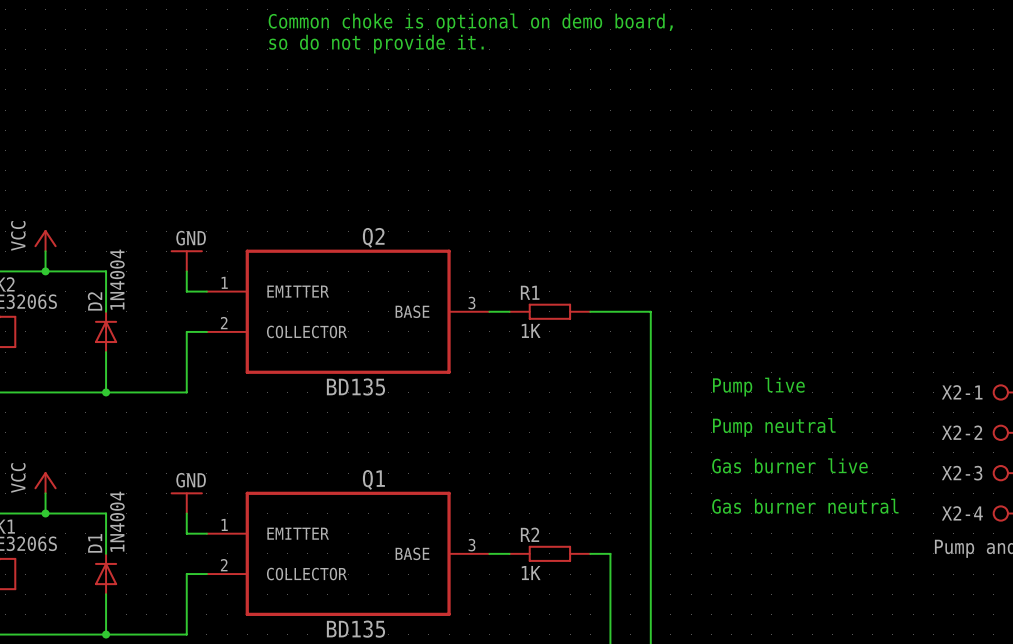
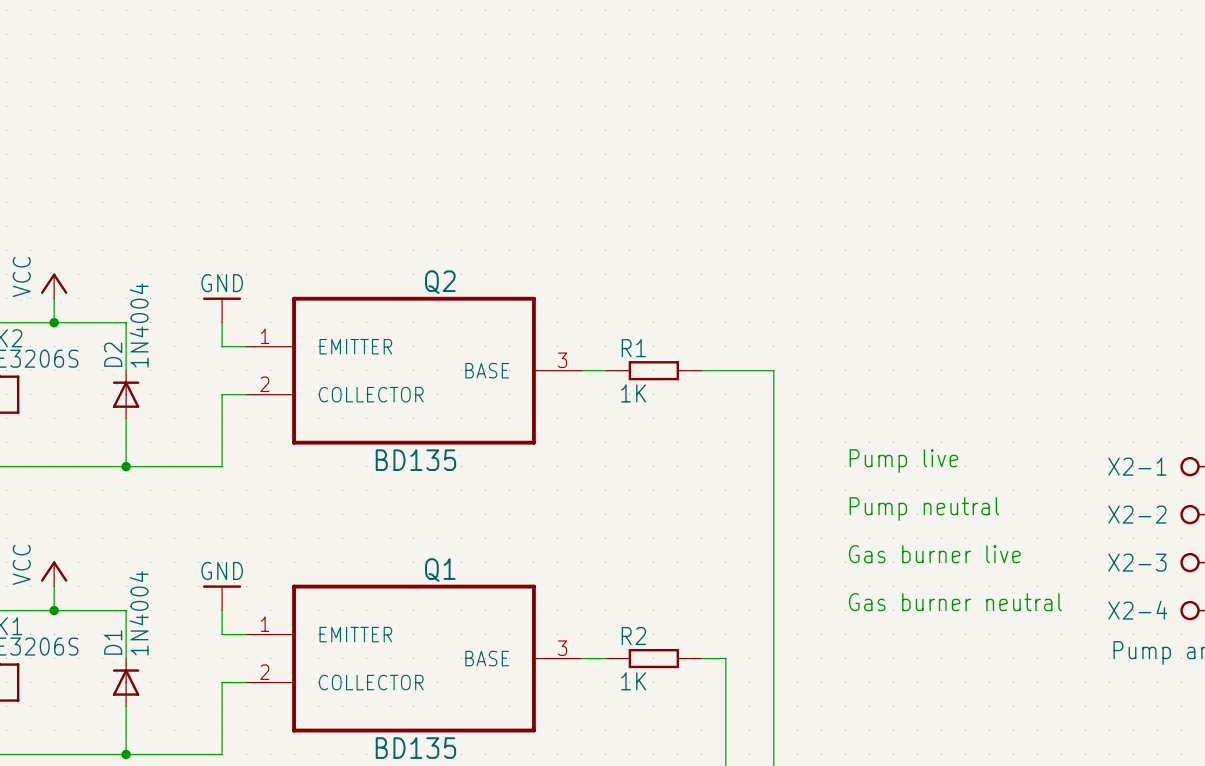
text: Common choke is optional on demo board, (470, 22) -> none
text: so do not provide it. (376, 44) -> none

